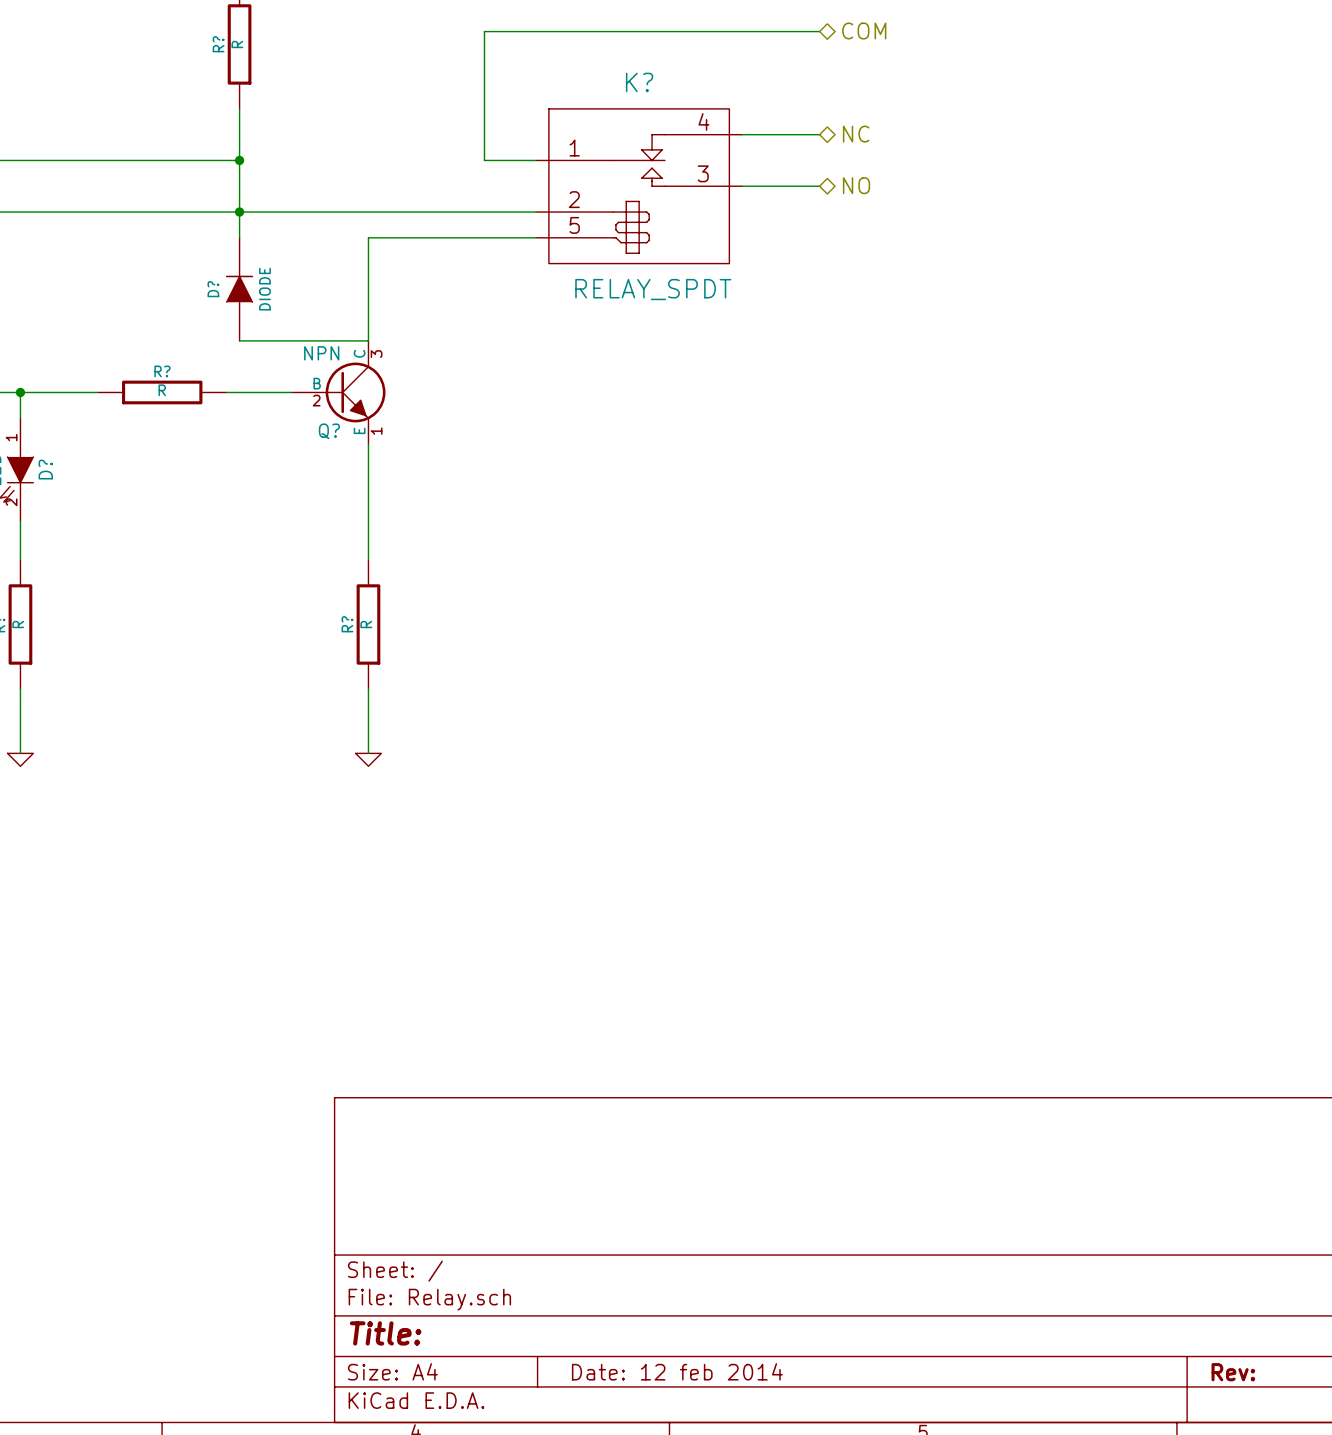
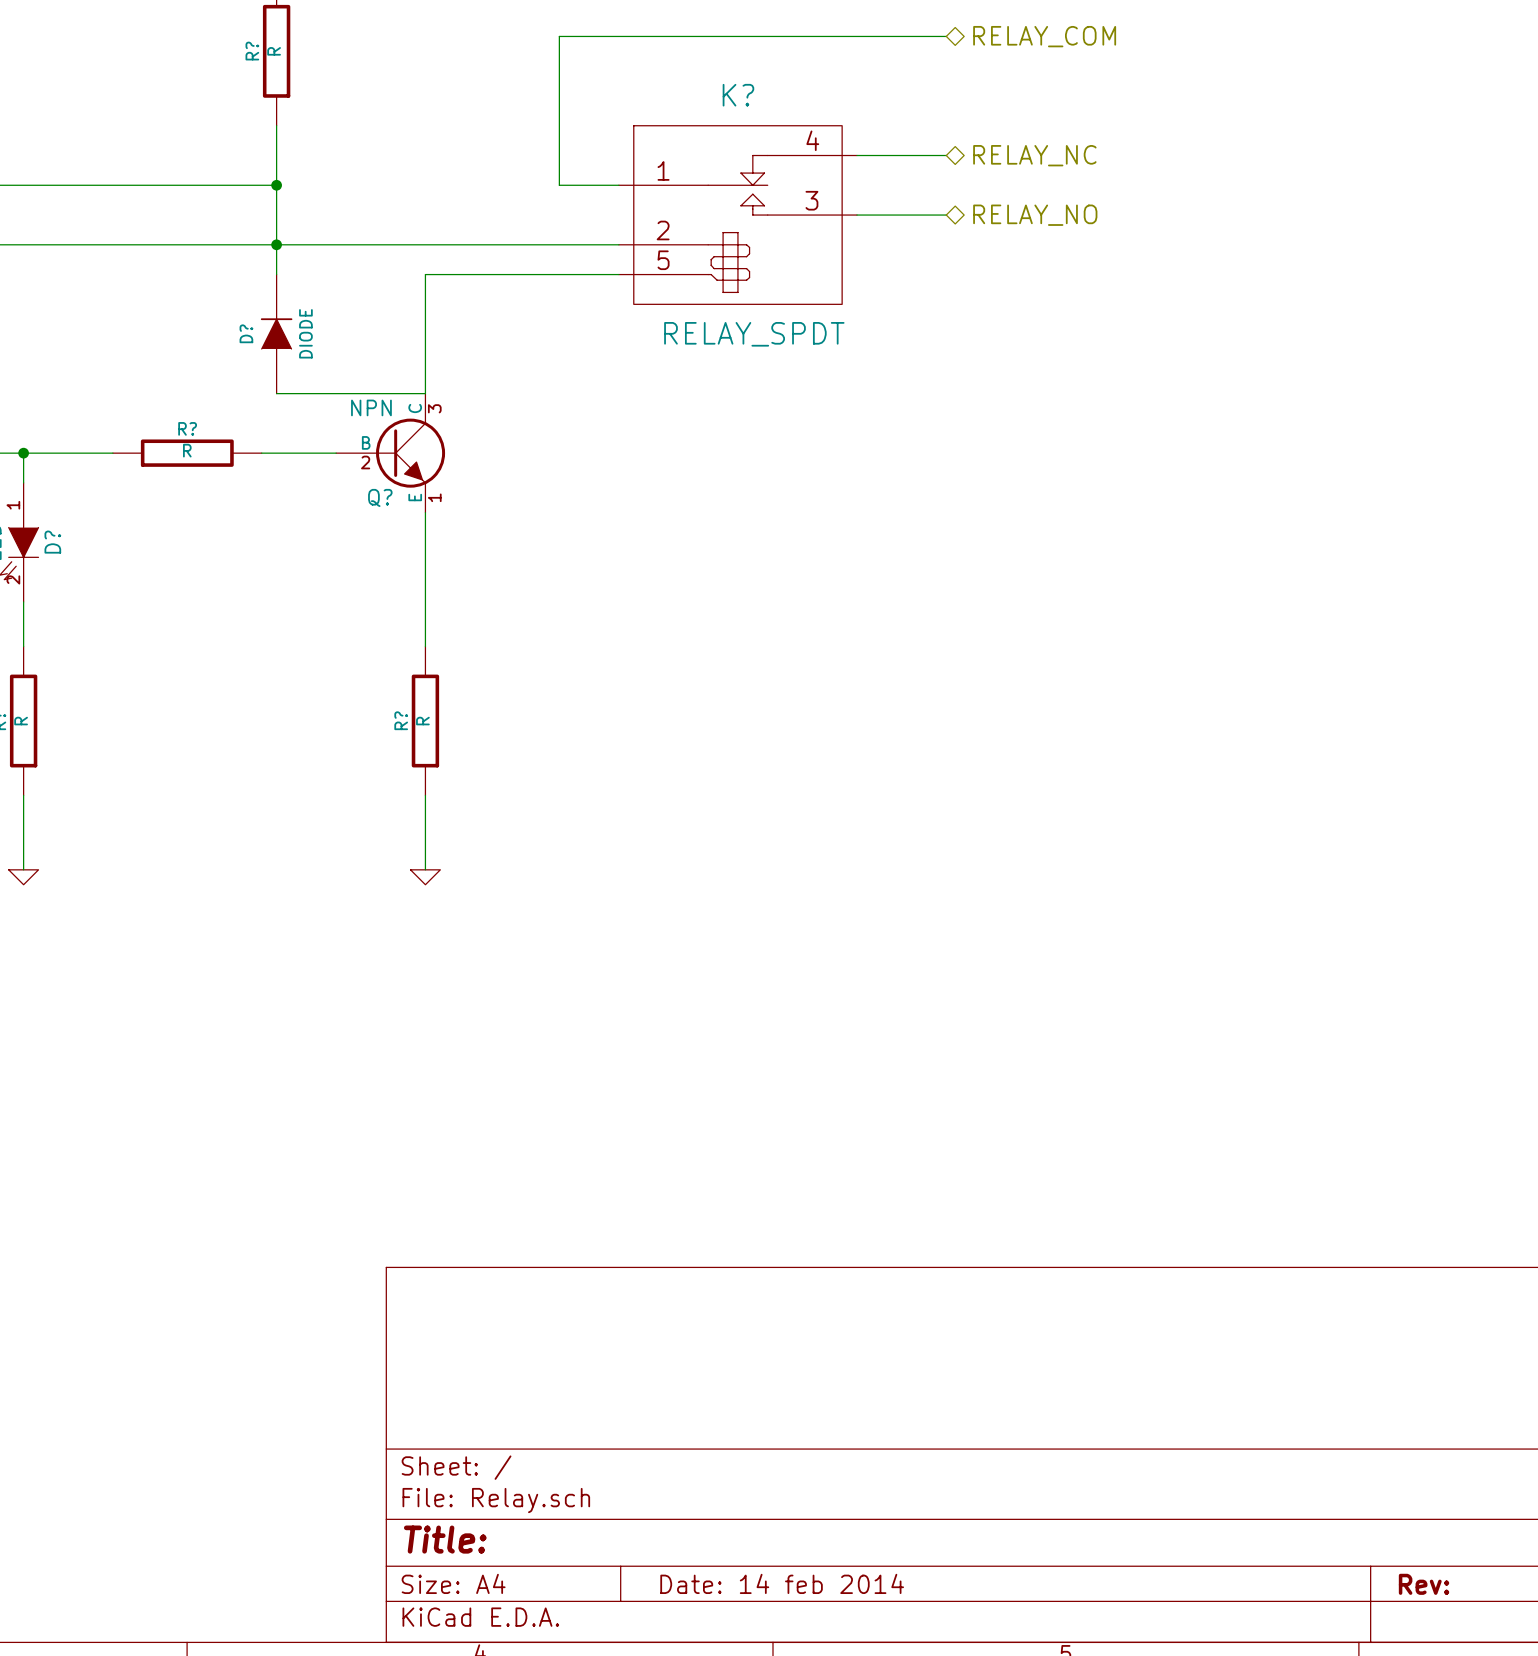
hierarchical label: COM (864, 30) -> RELAY_COM (1044, 36)
hierarchical label: NC (856, 134) -> RELAY_NC (1034, 155)
hierarchical label: NO (856, 185) -> RELAY_NO (1035, 215)
title block: Date: 12 feb 2014 (677, 1371) -> Date: 14 feb 2014 (782, 1583)

